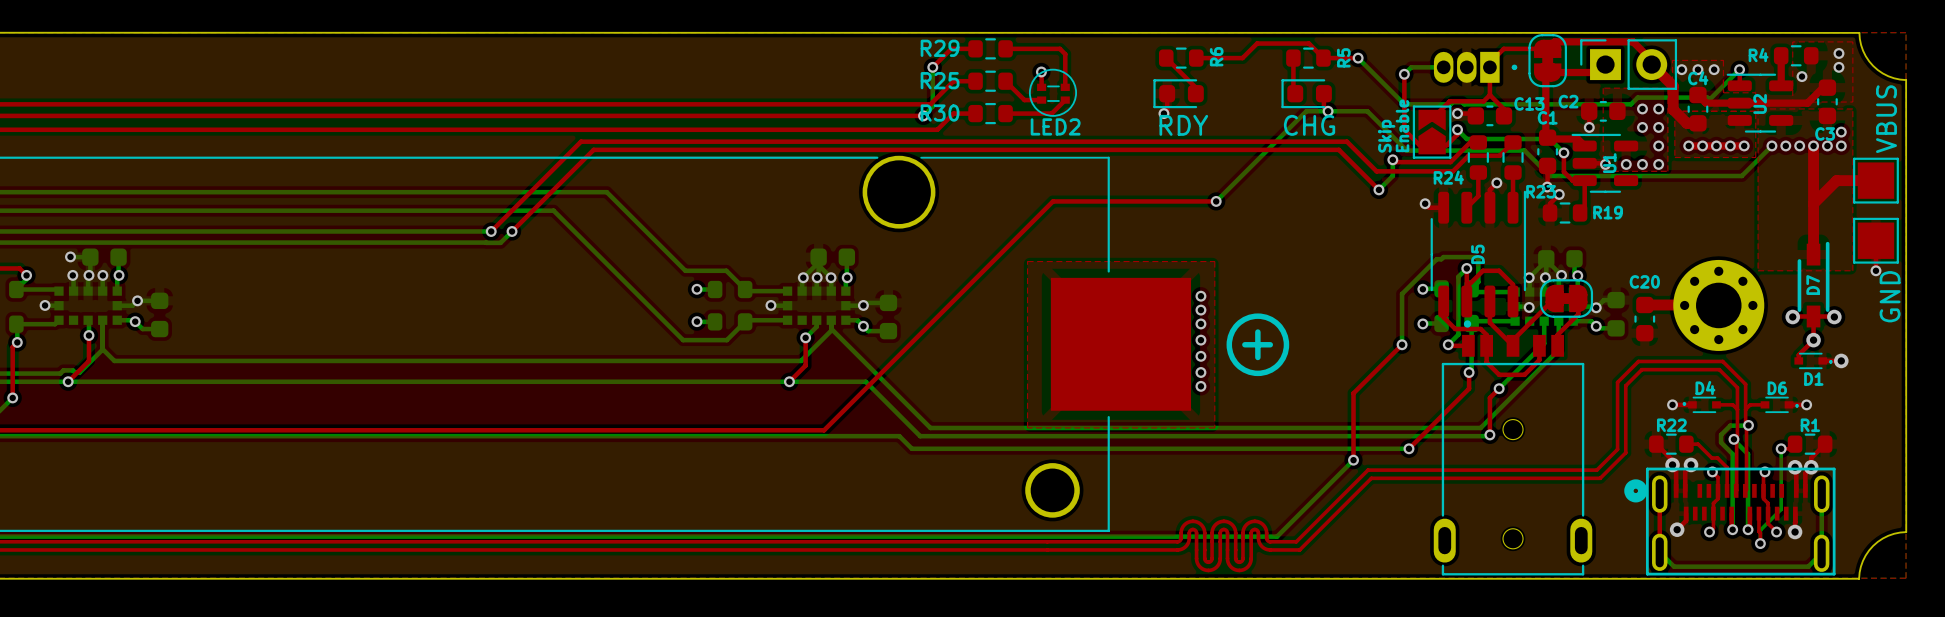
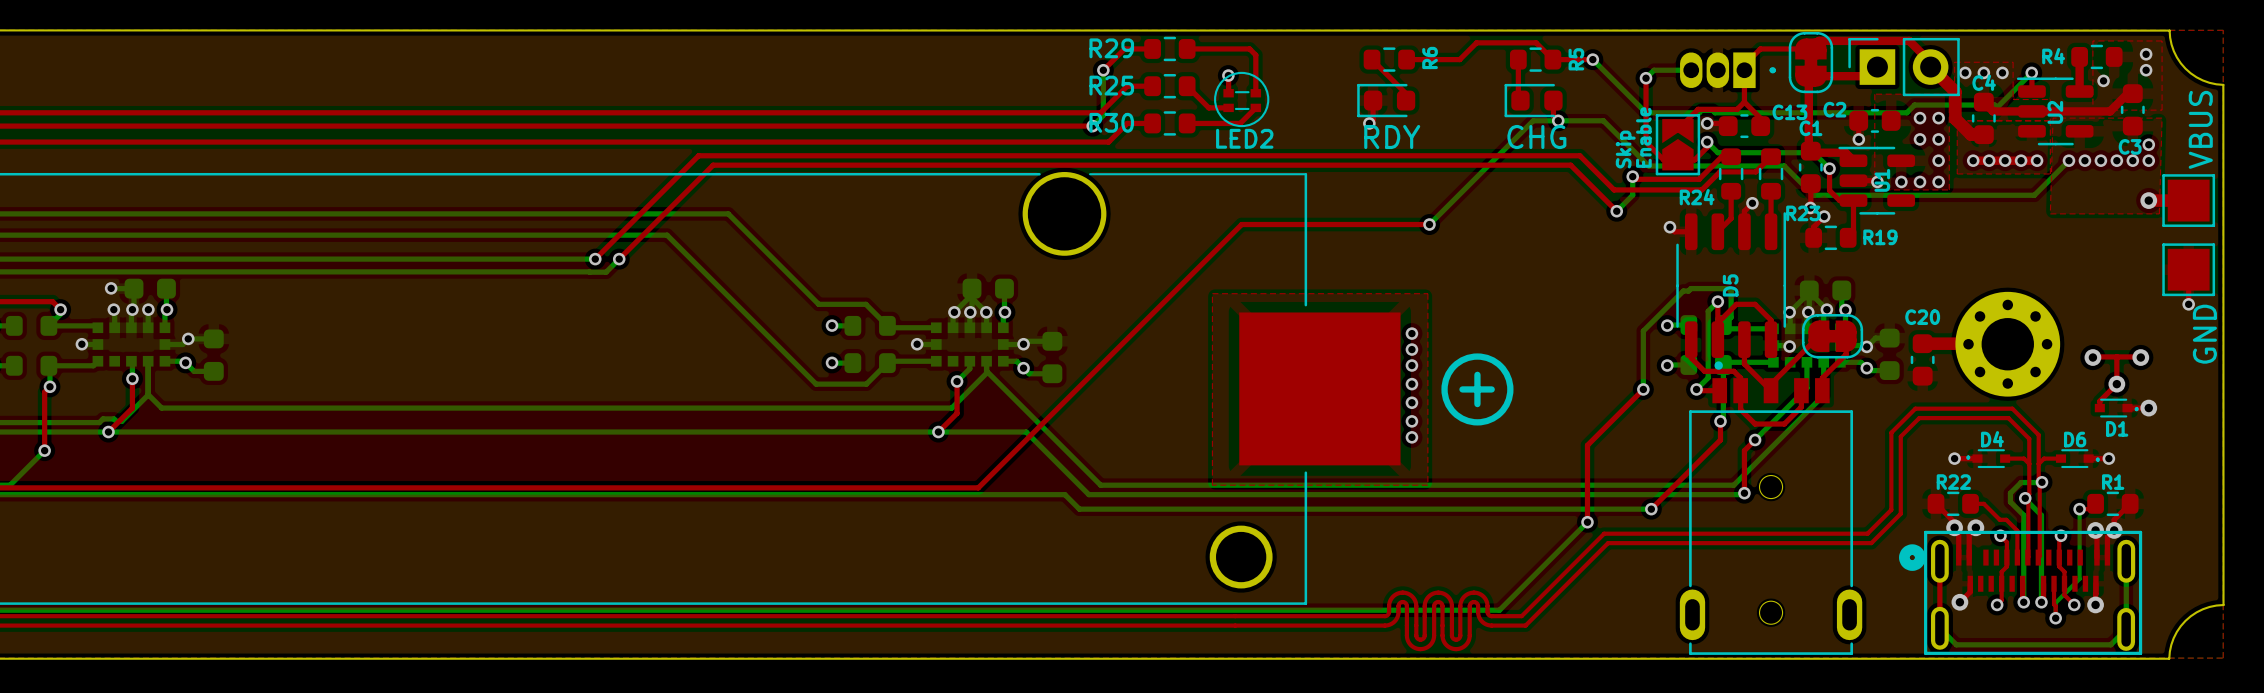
top zone outline: (1758, 108) (1758, 270) (1852, 270) (1852, 108) -> (2053, 118) (2050, 213) (2159, 213) (2162, 118)
top track: (1813, 145) (1813, 254) -> none
top track: (1841, 180) (1836, 180) (1813, 203) -> none
via: none -> (2148, 200)
D7: (1813, 284) -> none

